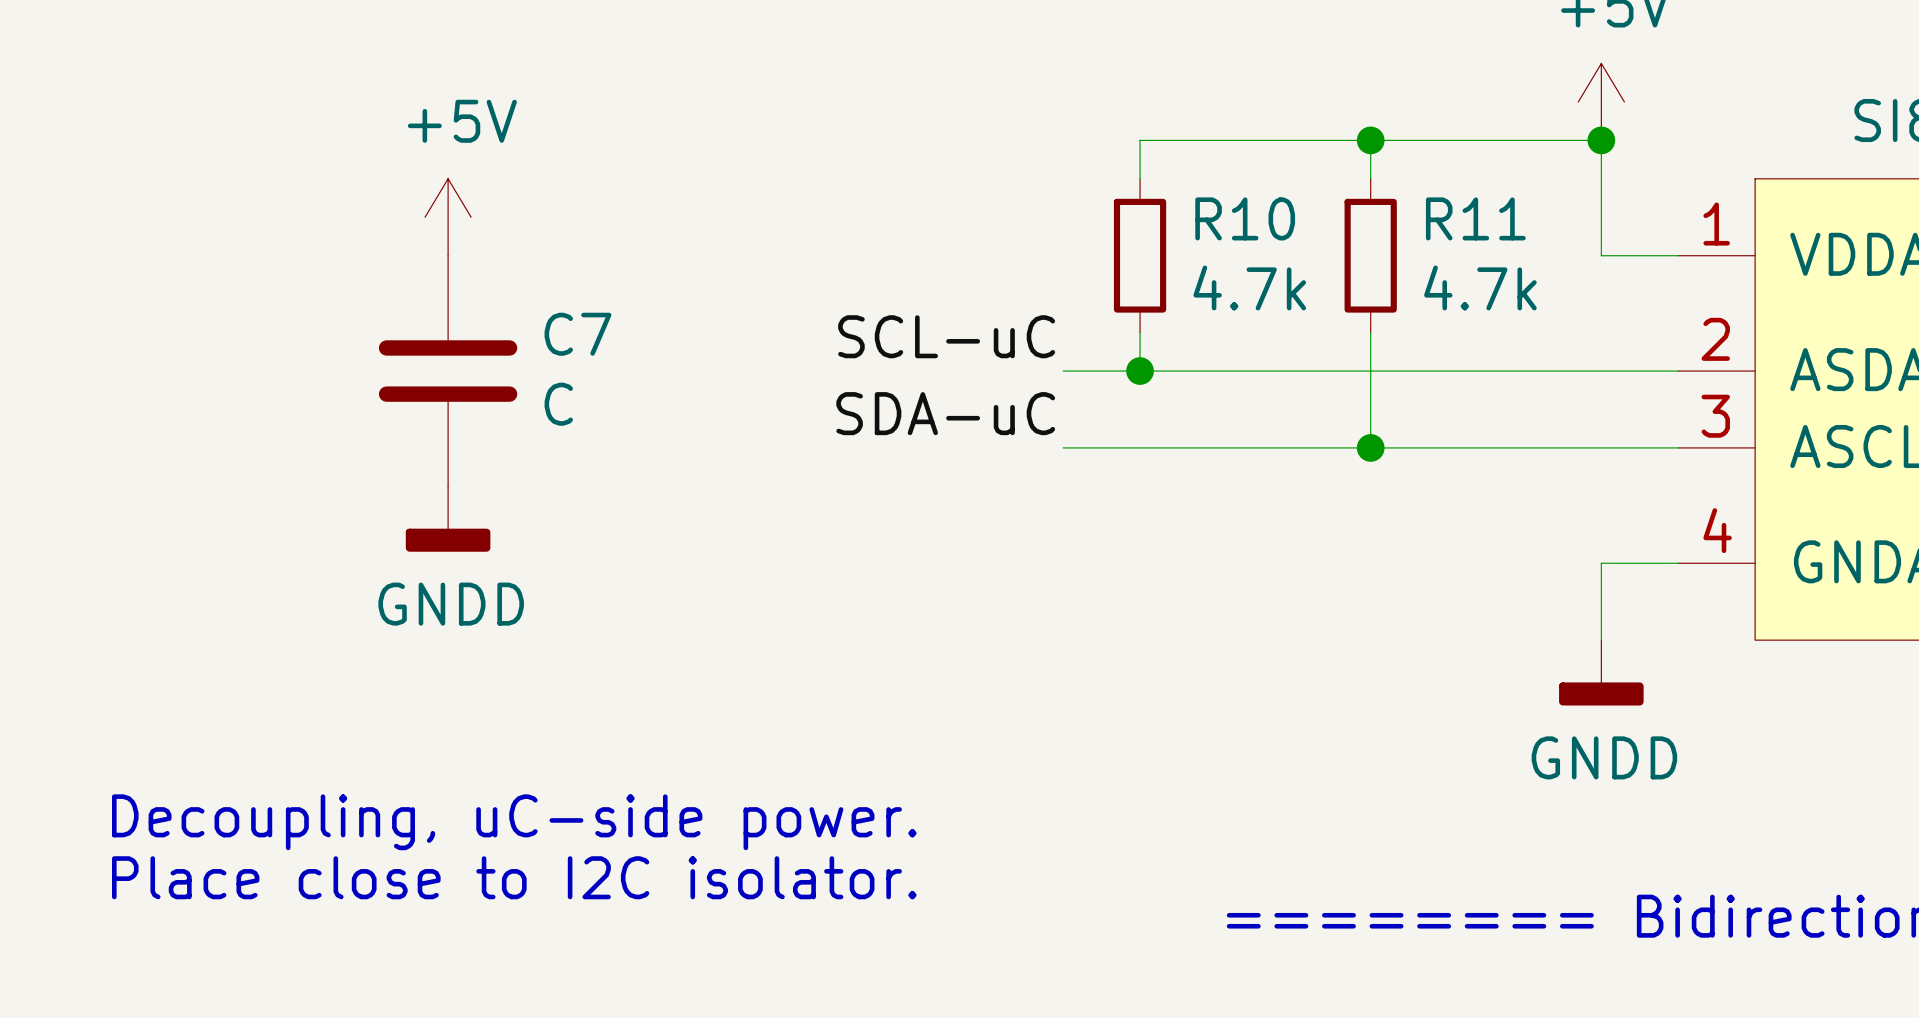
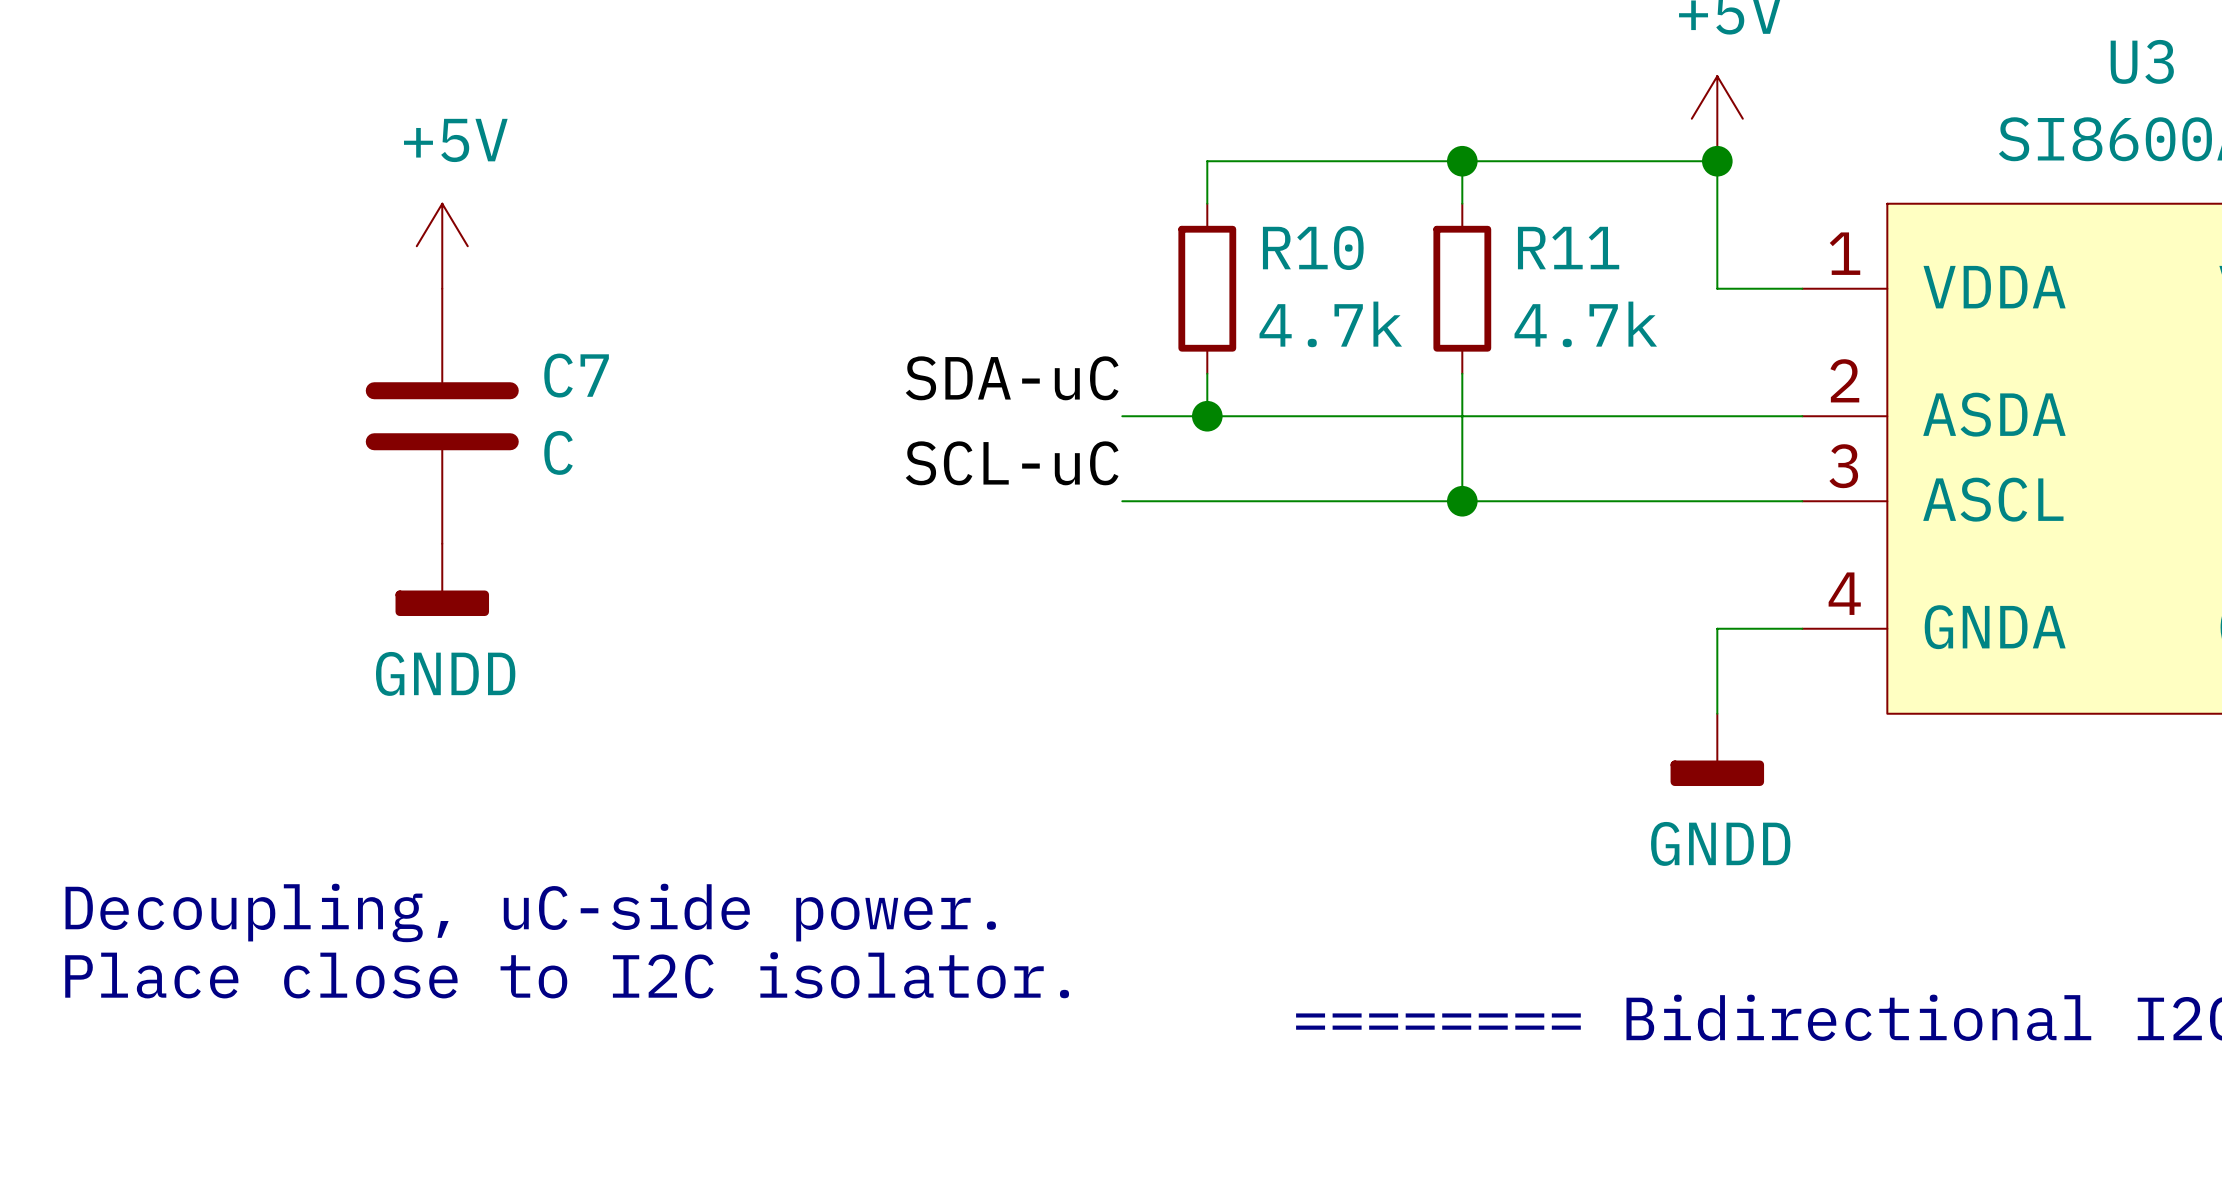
label: SCL-uC (946, 336) -> SDA-uC (1012, 378)
label: SDA-uC (945, 413) -> SCL-uC (1012, 463)

